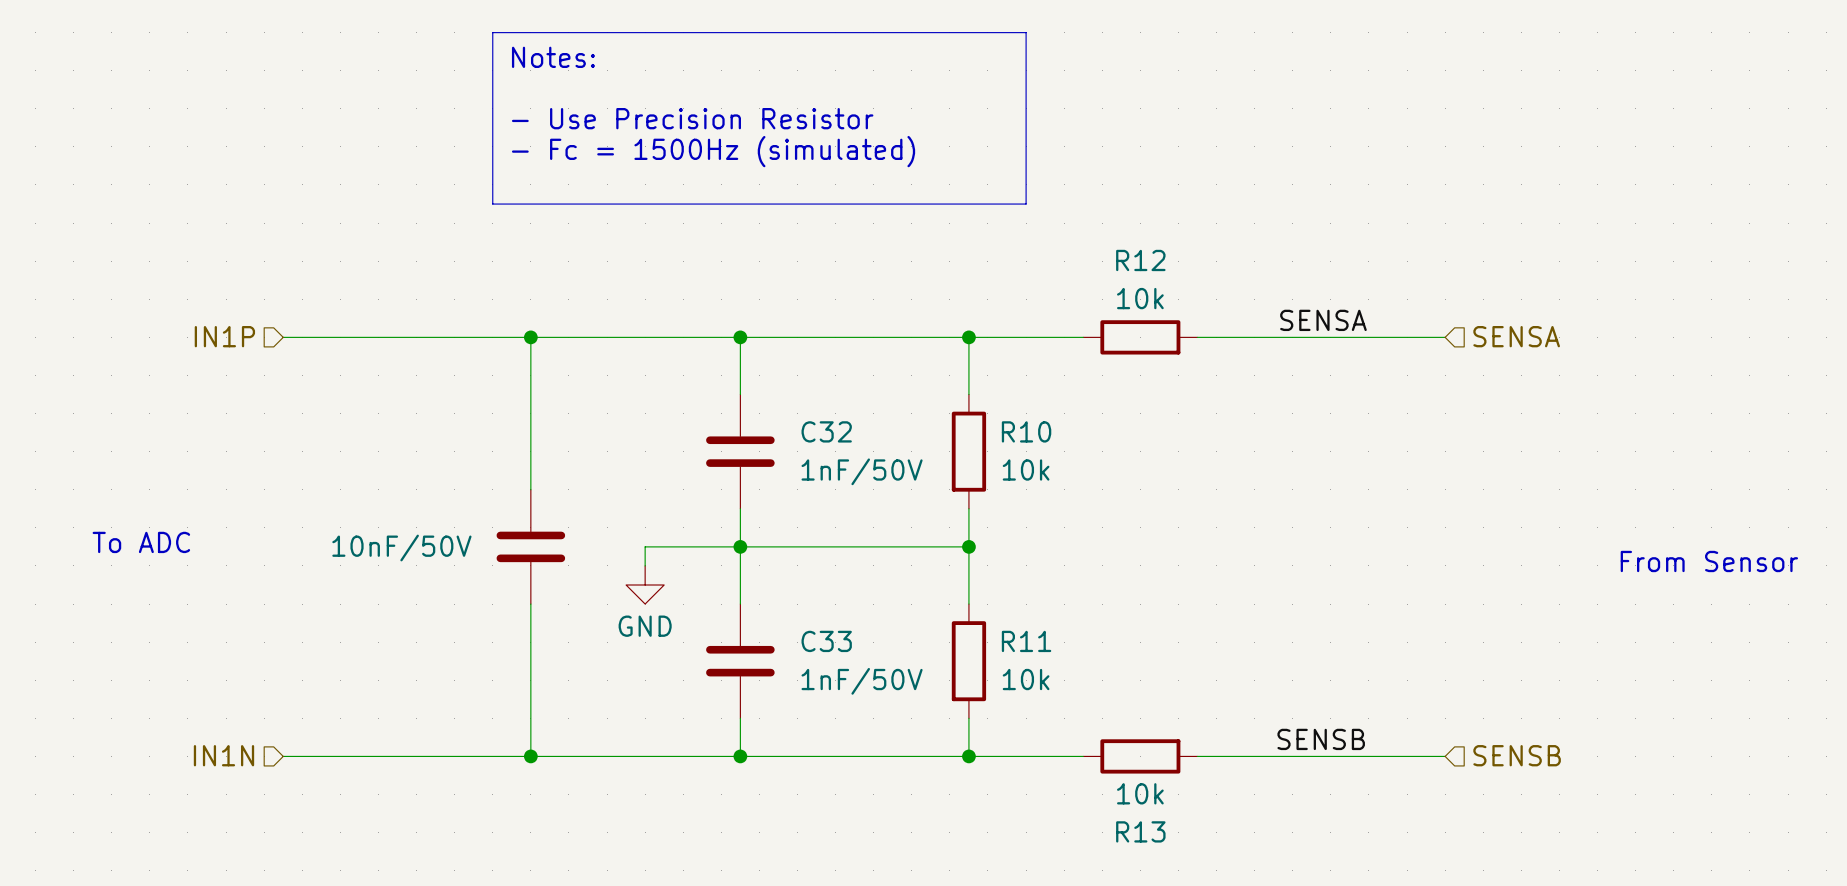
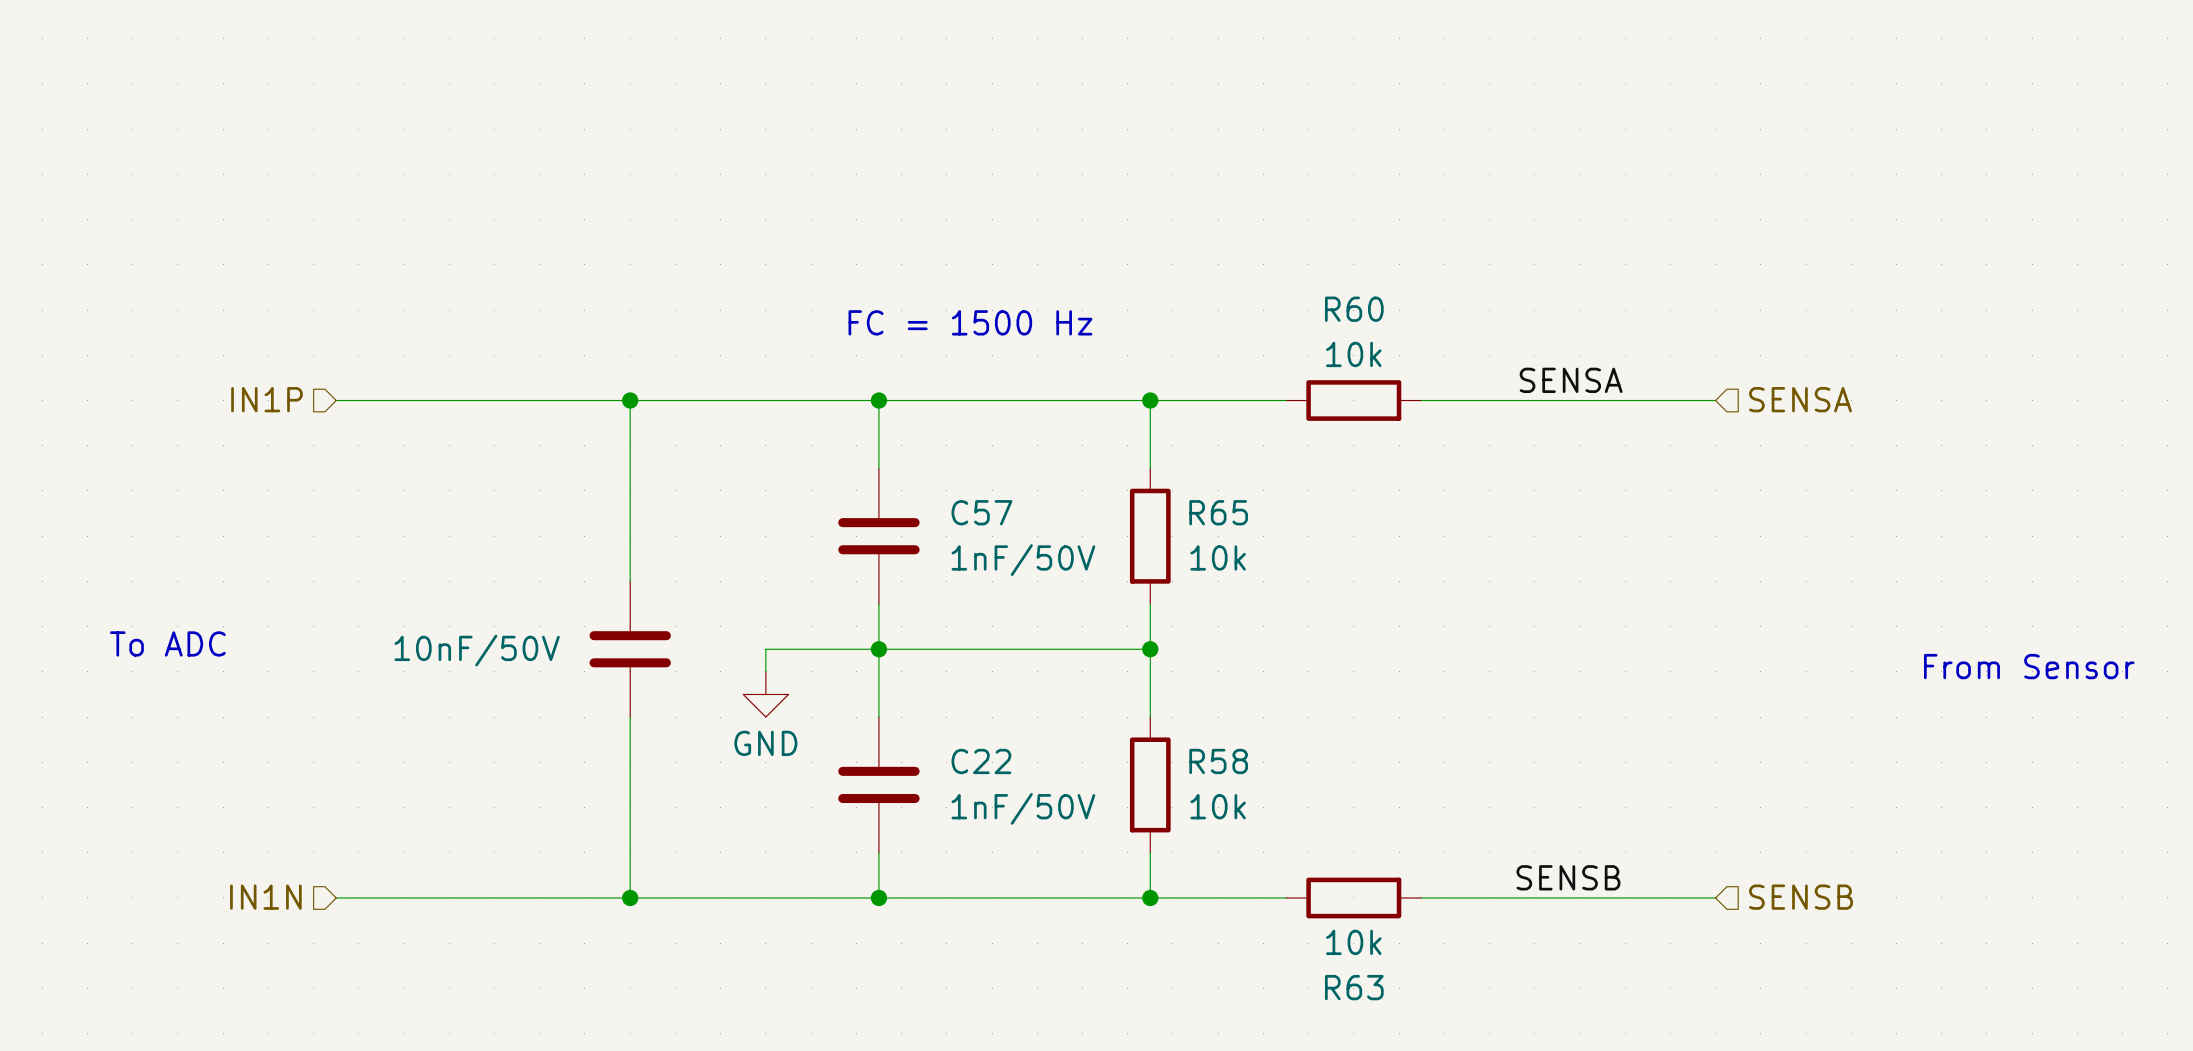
line: (492, 32) (1026, 32) (1026, 204) (492, 204) (492, 32) -> none
text: Notes: (553, 57) -> none
text: - Use Precision Resistor (692, 118) -> none
text: - Fc = 1500Hz (simulated) (713, 151) -> none
R12 name: R12 (1140, 260) -> R60 (1354, 309)
text: none -> FC = 1500 Hz (970, 322)
C32 name: C32 (826, 431) -> C57 (981, 512)
R10 name: R10 (1026, 431) -> R65 (1218, 512)
C33 name: C33 (826, 641) -> C22 (981, 761)
R11 name: R11 (1026, 641) -> R58 (1218, 761)
R13 name: R13 (1140, 831) -> R63 (1354, 987)

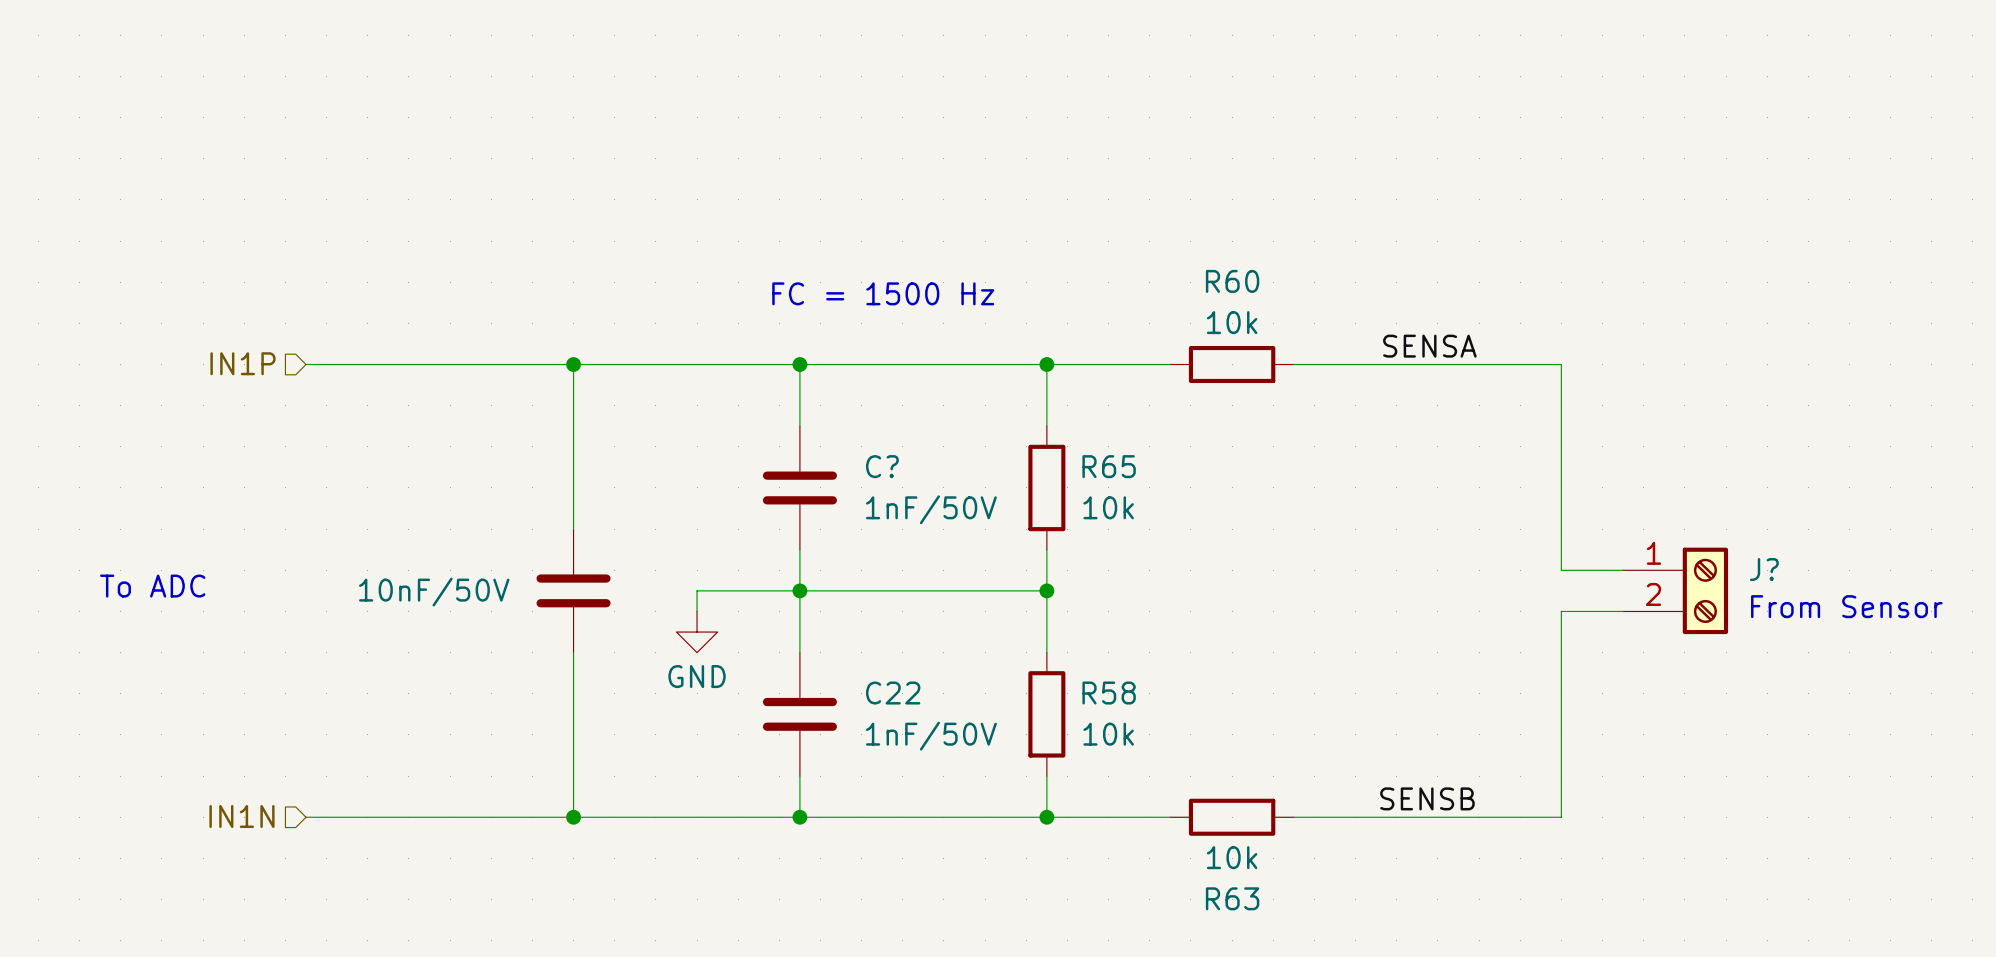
hierarchical label: SENSA (1800, 399) -> none
wire: none -> (1561, 364) (1561, 570) (1623, 570)
C57 name: C57 (981, 512) -> C? (882, 466)
J?: none -> (1675, 590)
wire: none -> (1623, 611) (1561, 611) (1561, 817)
hierarchical label: SENSB (1801, 897) -> none

